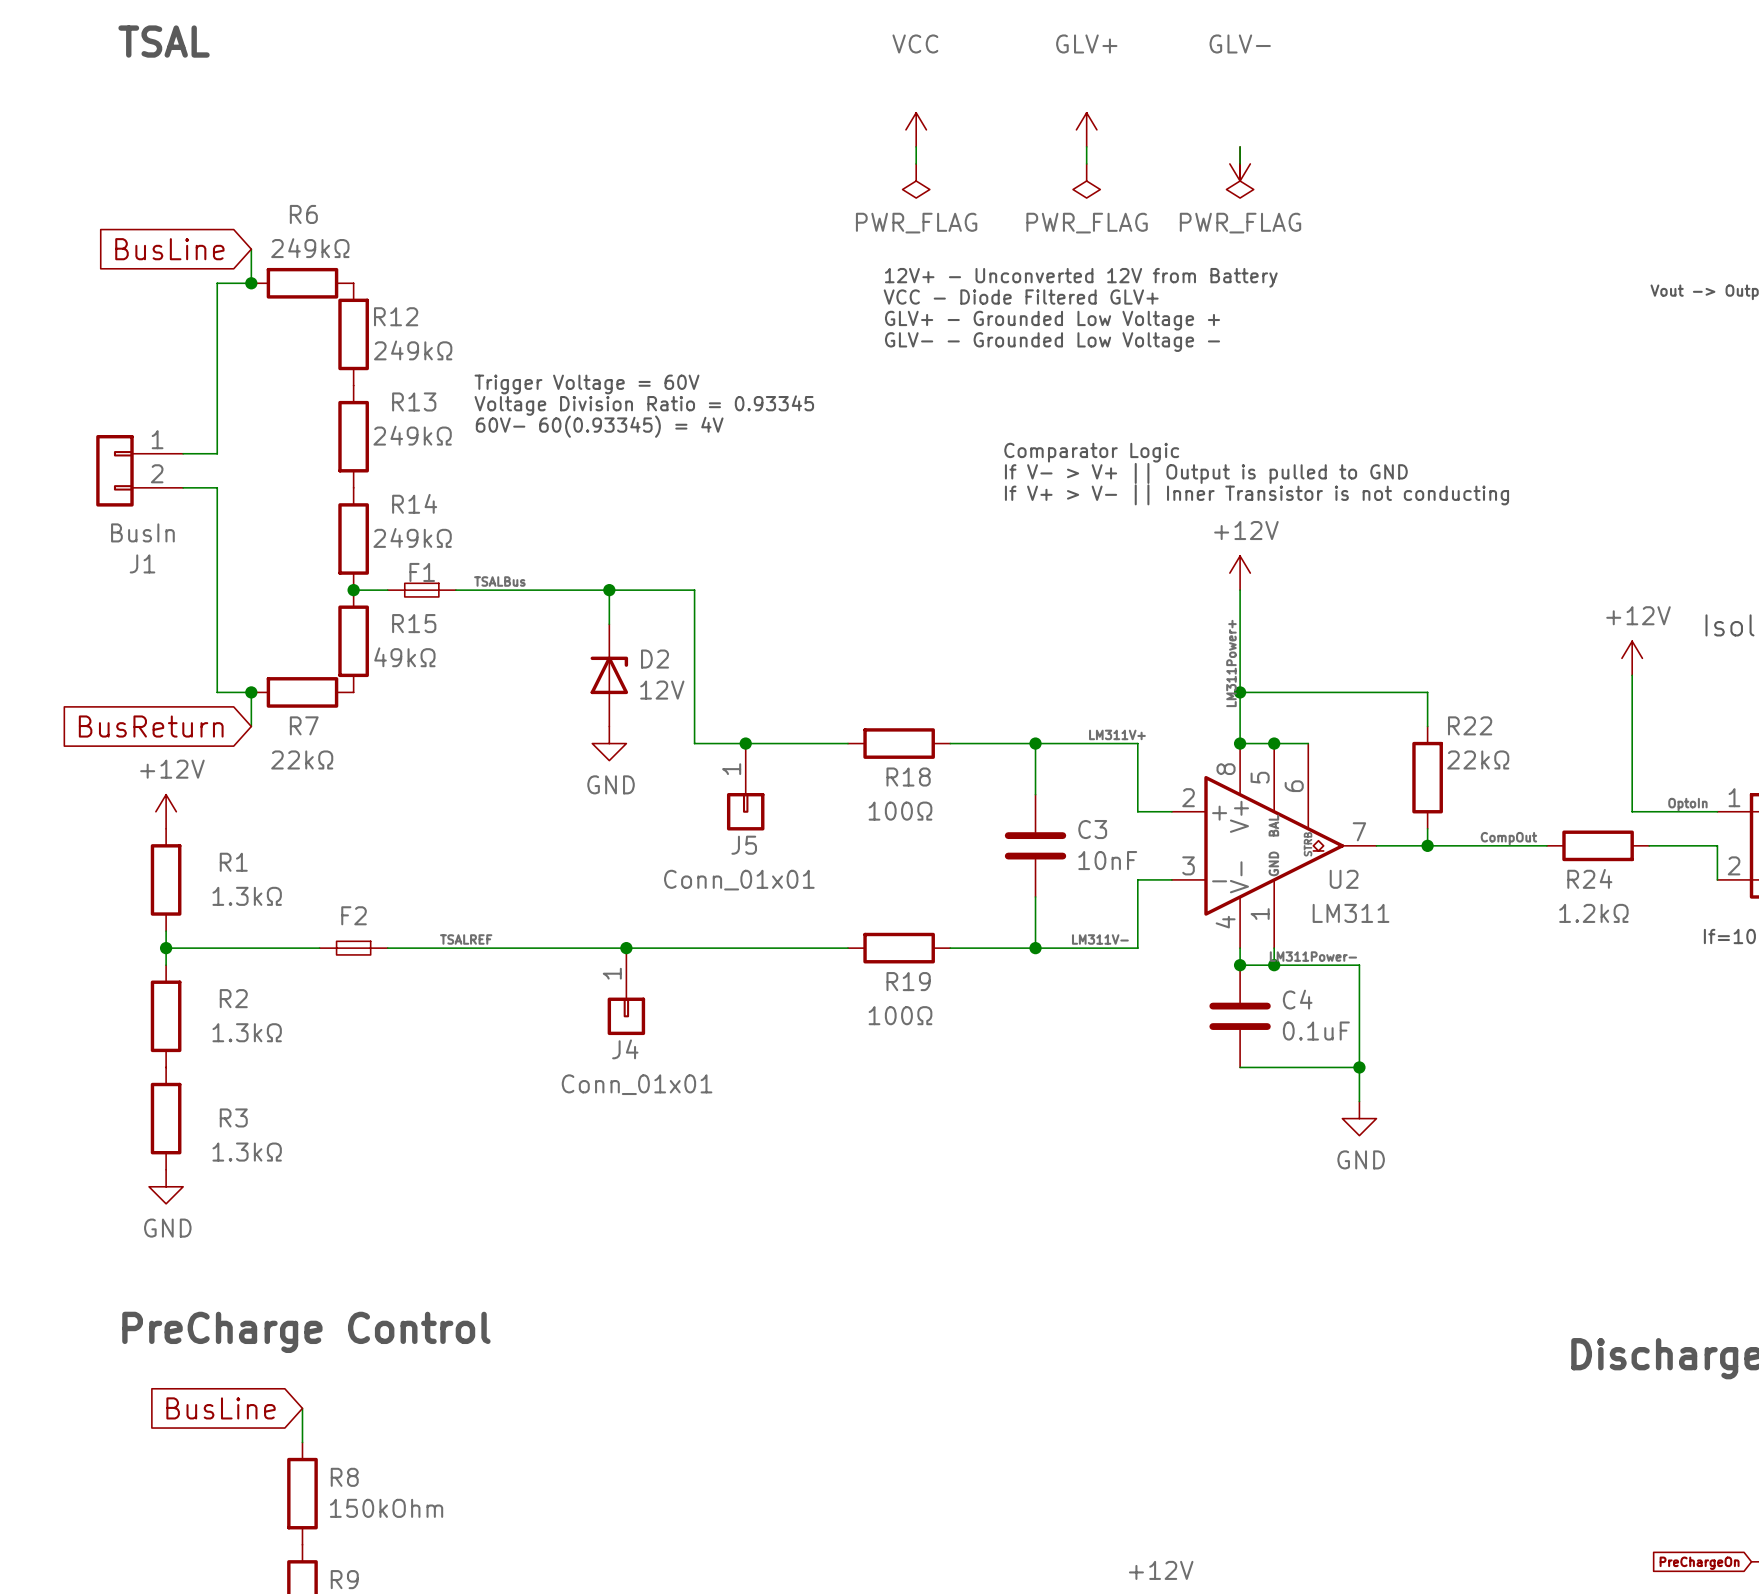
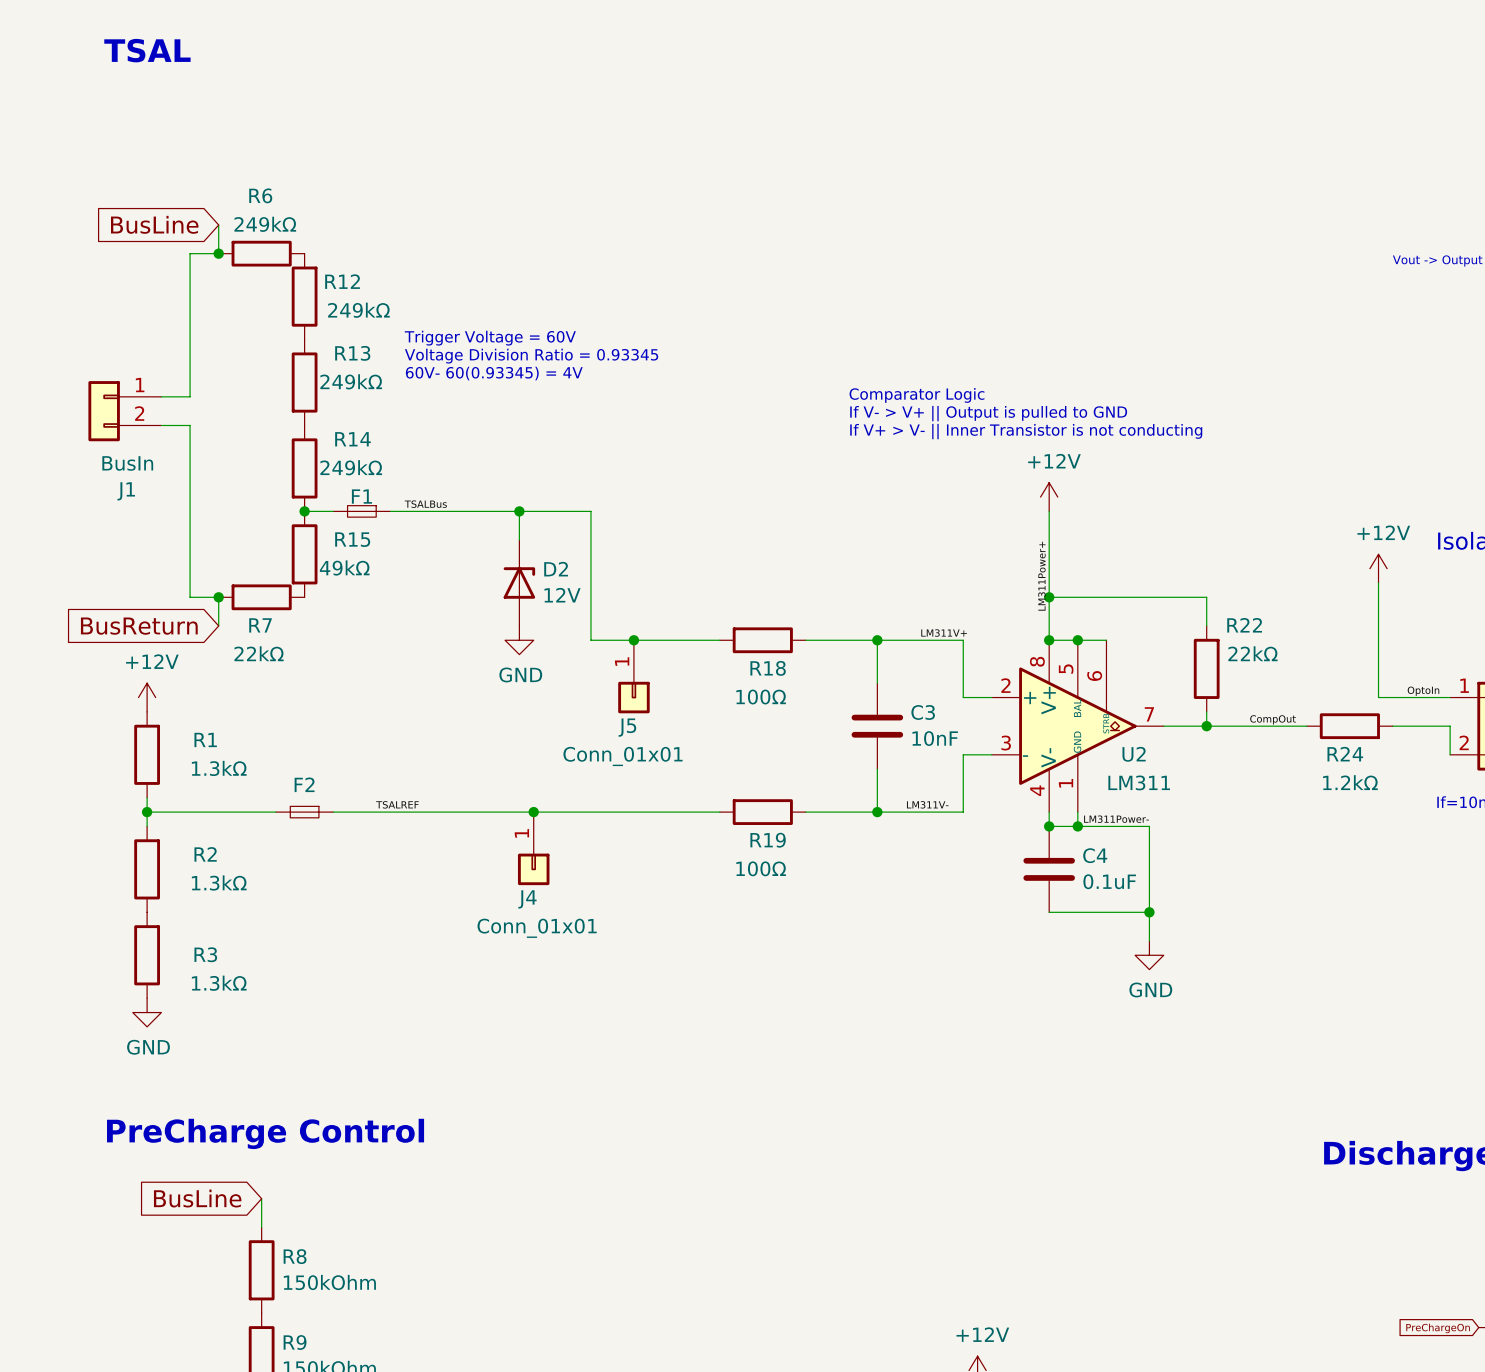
power symbol: VCC (916, 129) -> none
power symbol: GLV+ (1086, 129) -> none
wire: (916, 146) (916, 163) -> none
wire: (1086, 146) (1086, 163) -> none
wire: (1240, 146) (1240, 163) -> none
power symbol: GLV- (1240, 163) -> none
power symbol: PWR_FLAG (916, 180) -> none
power symbol: PWR_FLAG (1086, 180) -> none
power symbol: PWR_FLAG (1240, 180) -> none
text: 12V+ - Unconverted 12V from Battery (1081, 277) -> none
text: VCC - Diode Filtered GLV+ (1021, 297) -> none
text: GLV+ - Grounded Low Voltage + (1052, 320) -> none
text: GLV- - Grounded Low Voltage - (1052, 342) -> none

